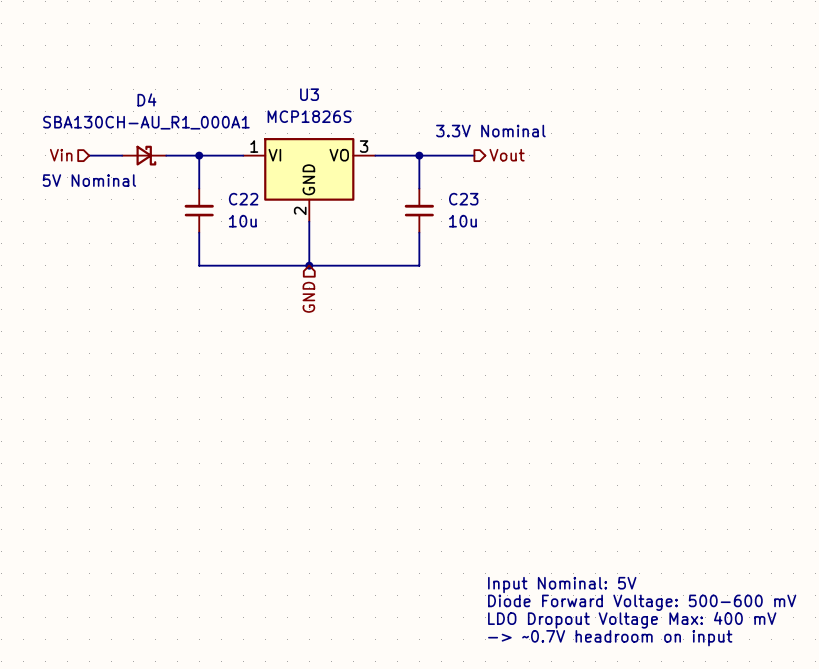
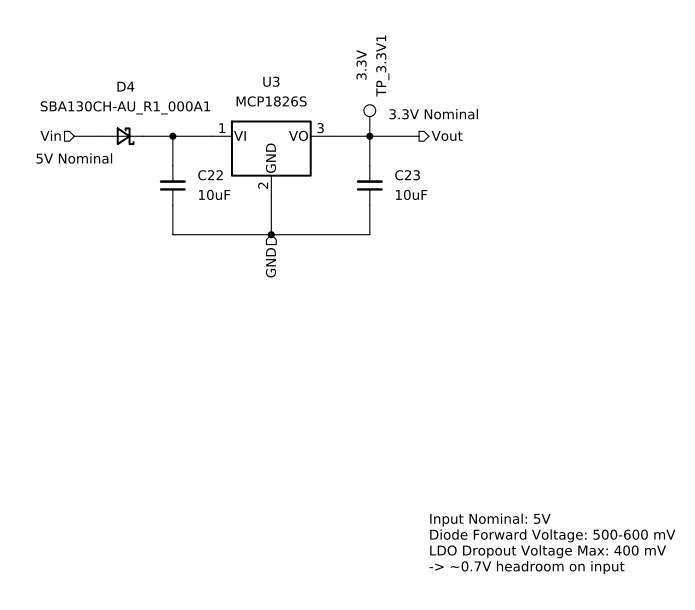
TP_3.3V1: none -> 3.3V (369, 120)
C22 value: 10u (242, 221) -> 10uF (214, 194)
C23 value: 10u (462, 221) -> 10uF (411, 194)

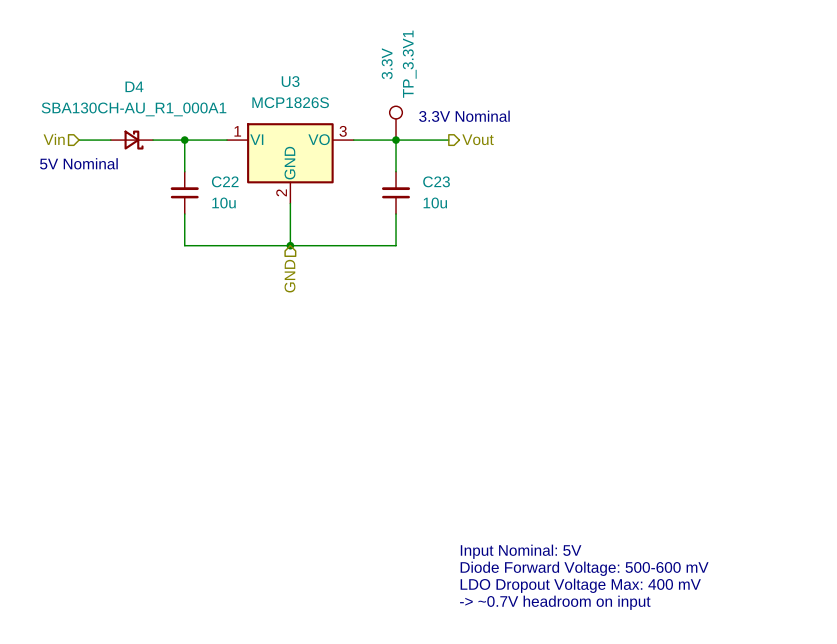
C22 value: 10uF (214, 194) -> 10u (224, 202)
C23 value: 10uF (411, 194) -> 10u (435, 202)

